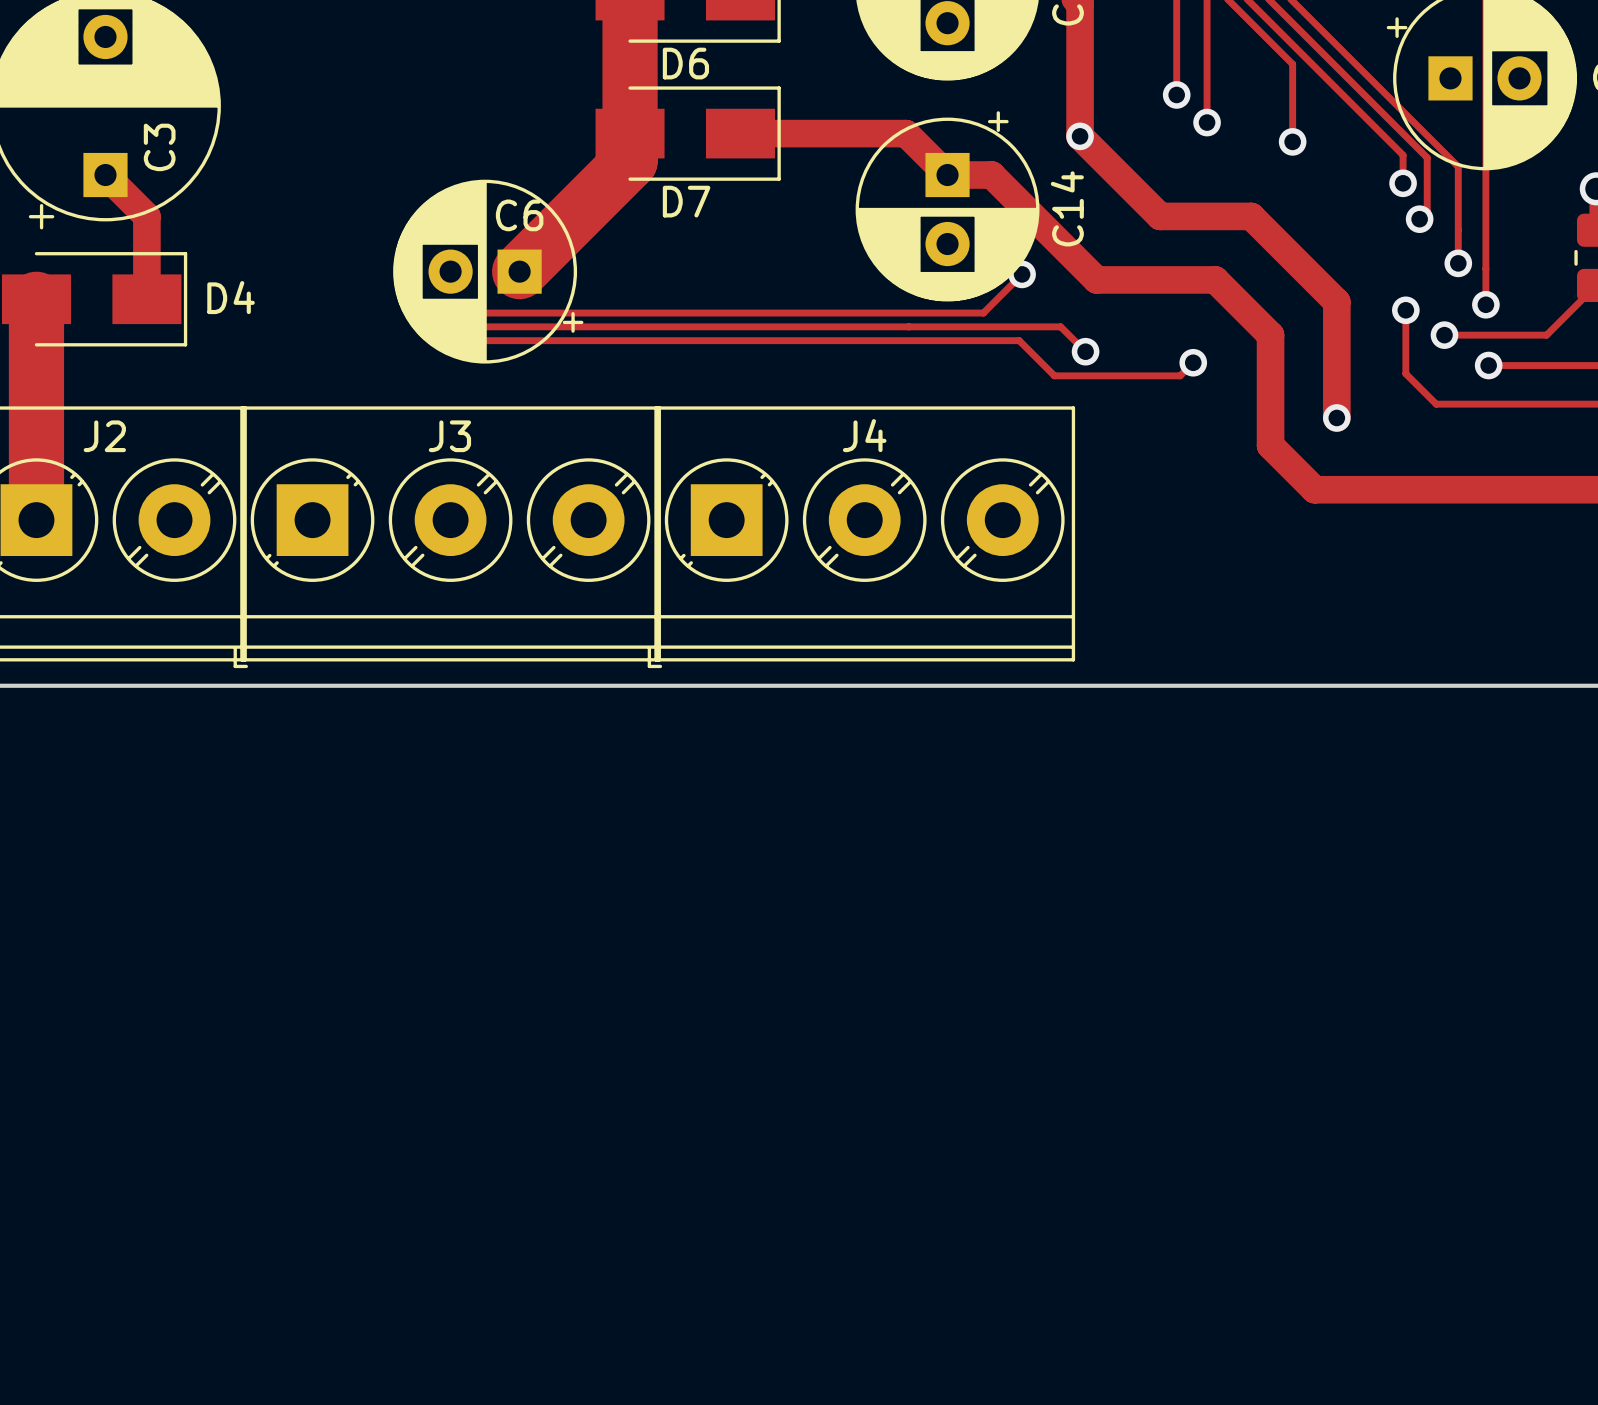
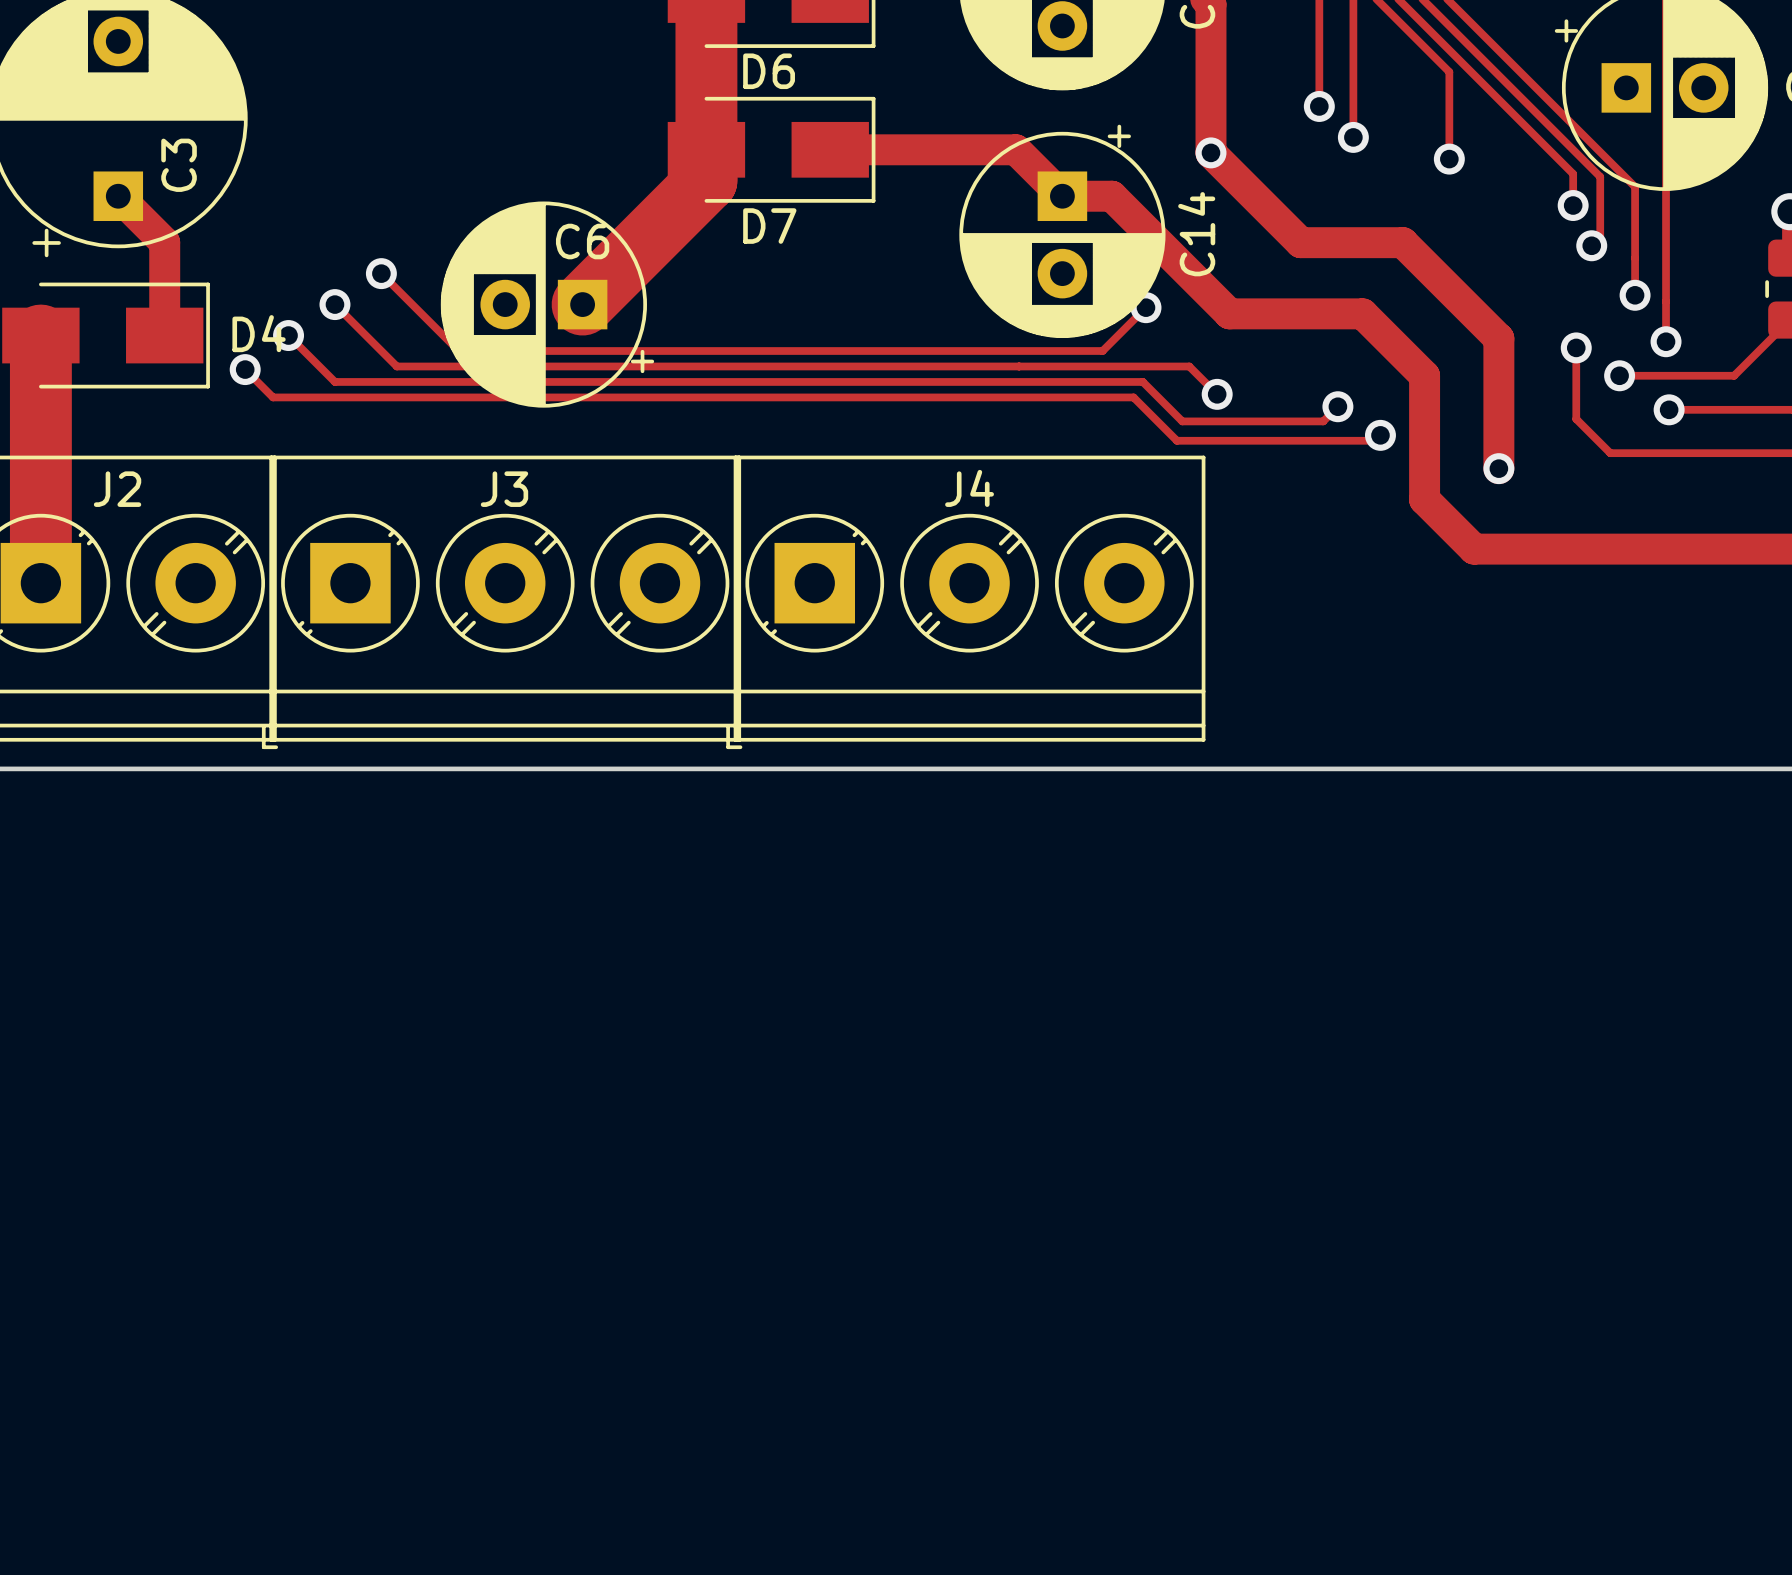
track: none -> (381, 273) (458, 351) (477, 351)
via: none -> (381, 273)
track: none -> (334, 304) (396, 366) (486, 366)
via: none -> (334, 304)
track: none -> (288, 335) (334, 381) (511, 381)
via: none -> (288, 335)
track: none -> (245, 369) (273, 397) (1133, 397) (1176, 440) (1375, 440) (1380, 435)
via: none -> (245, 369)
via: none -> (1380, 435)

